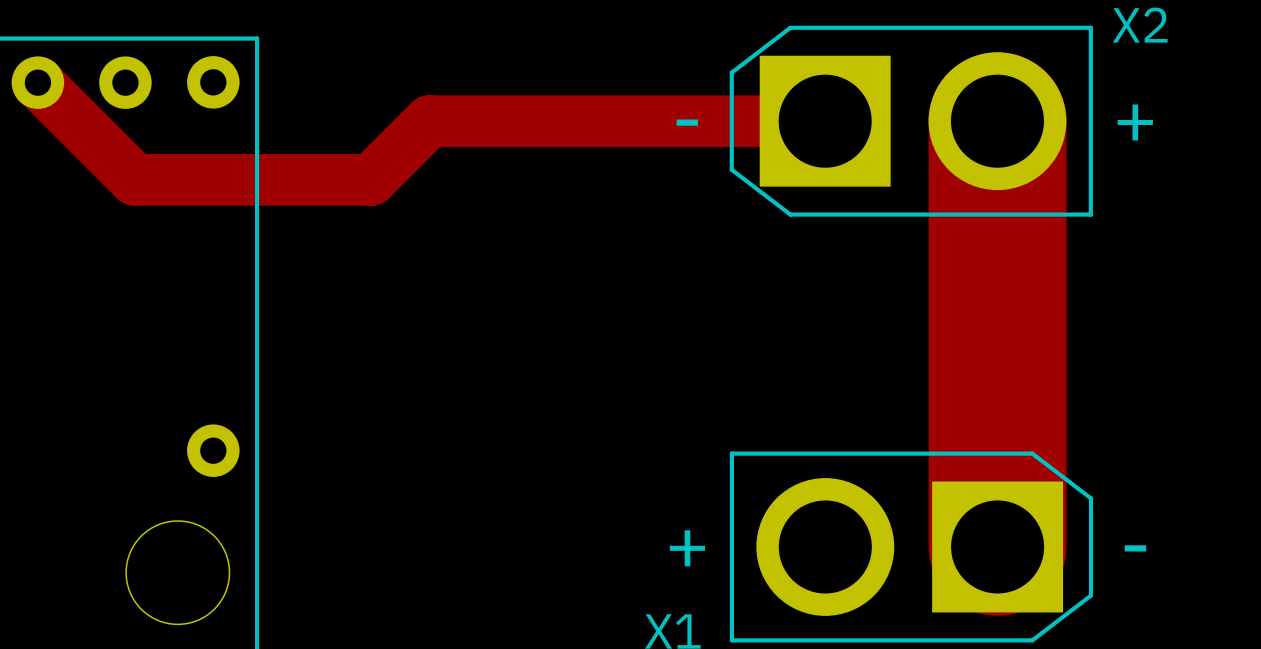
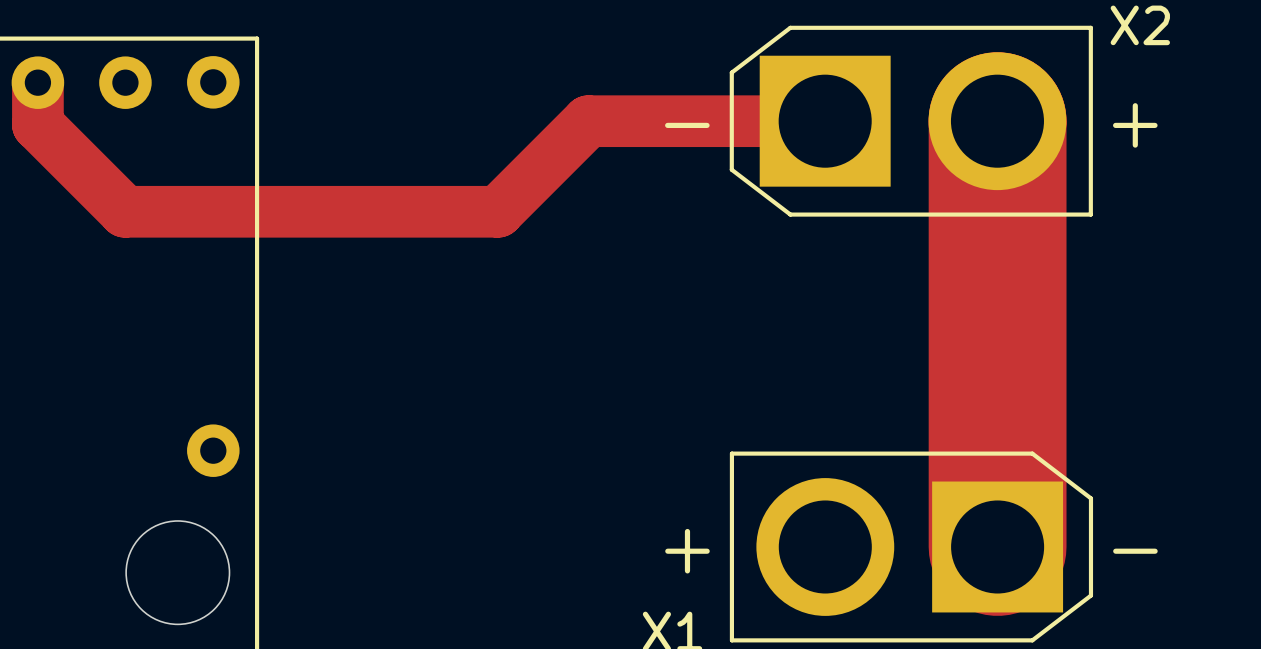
top track: (37, 82) (135, 179) (370, 179) (429, 121) (588, 121) -> (37, 82) (37, 124) (125, 211) (497, 211) (588, 121)

